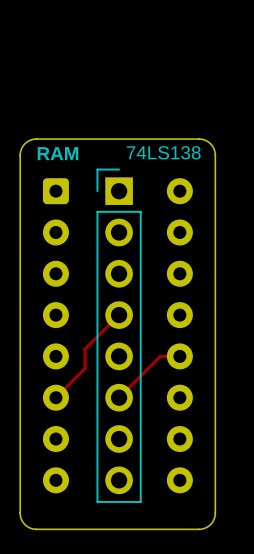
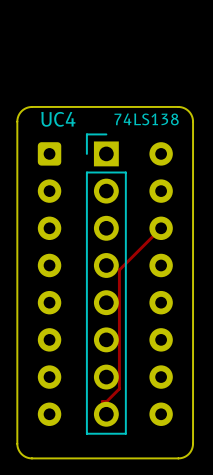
UC4 name: none -> UC4 (58, 119)
text: RAM (57, 153) -> none
track: none -> (161, 228) (119, 270) (119, 388) (106, 401) (102, 401) (102, 418)
track: (119, 315) (85, 349) (85, 368) (55, 397) -> none
track: (179, 356) (160, 356) (119, 397) -> none

